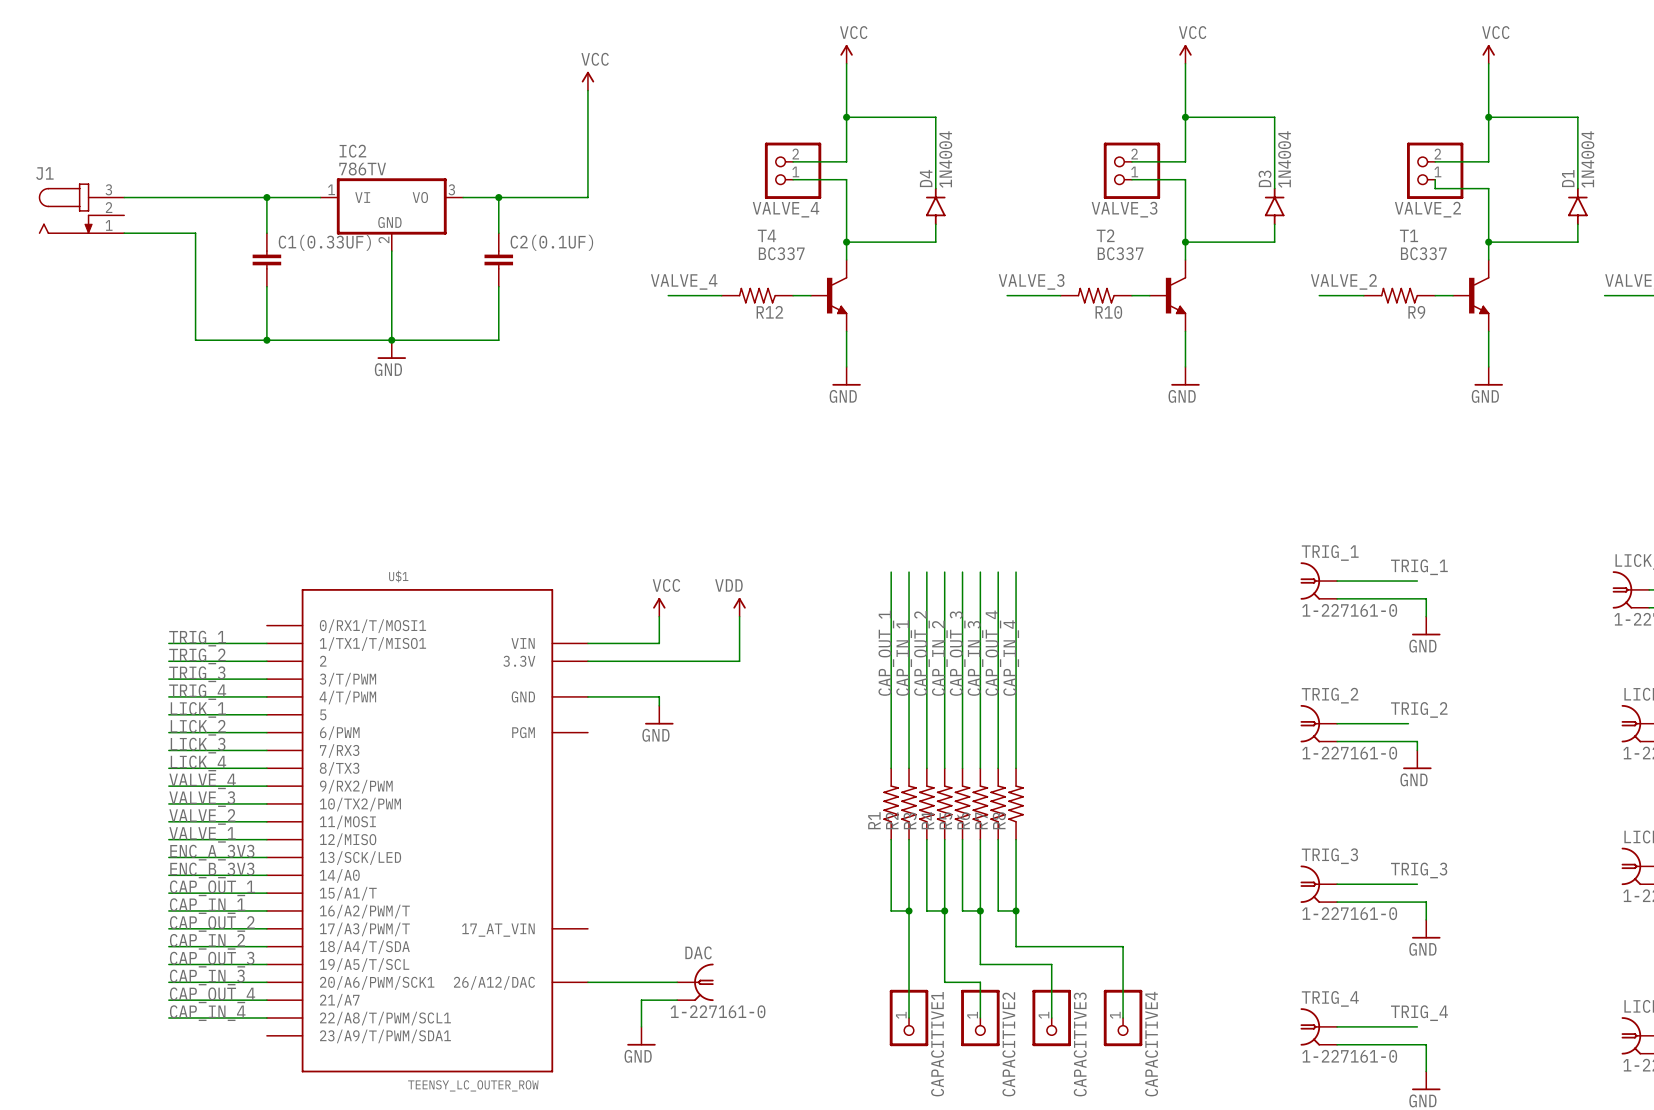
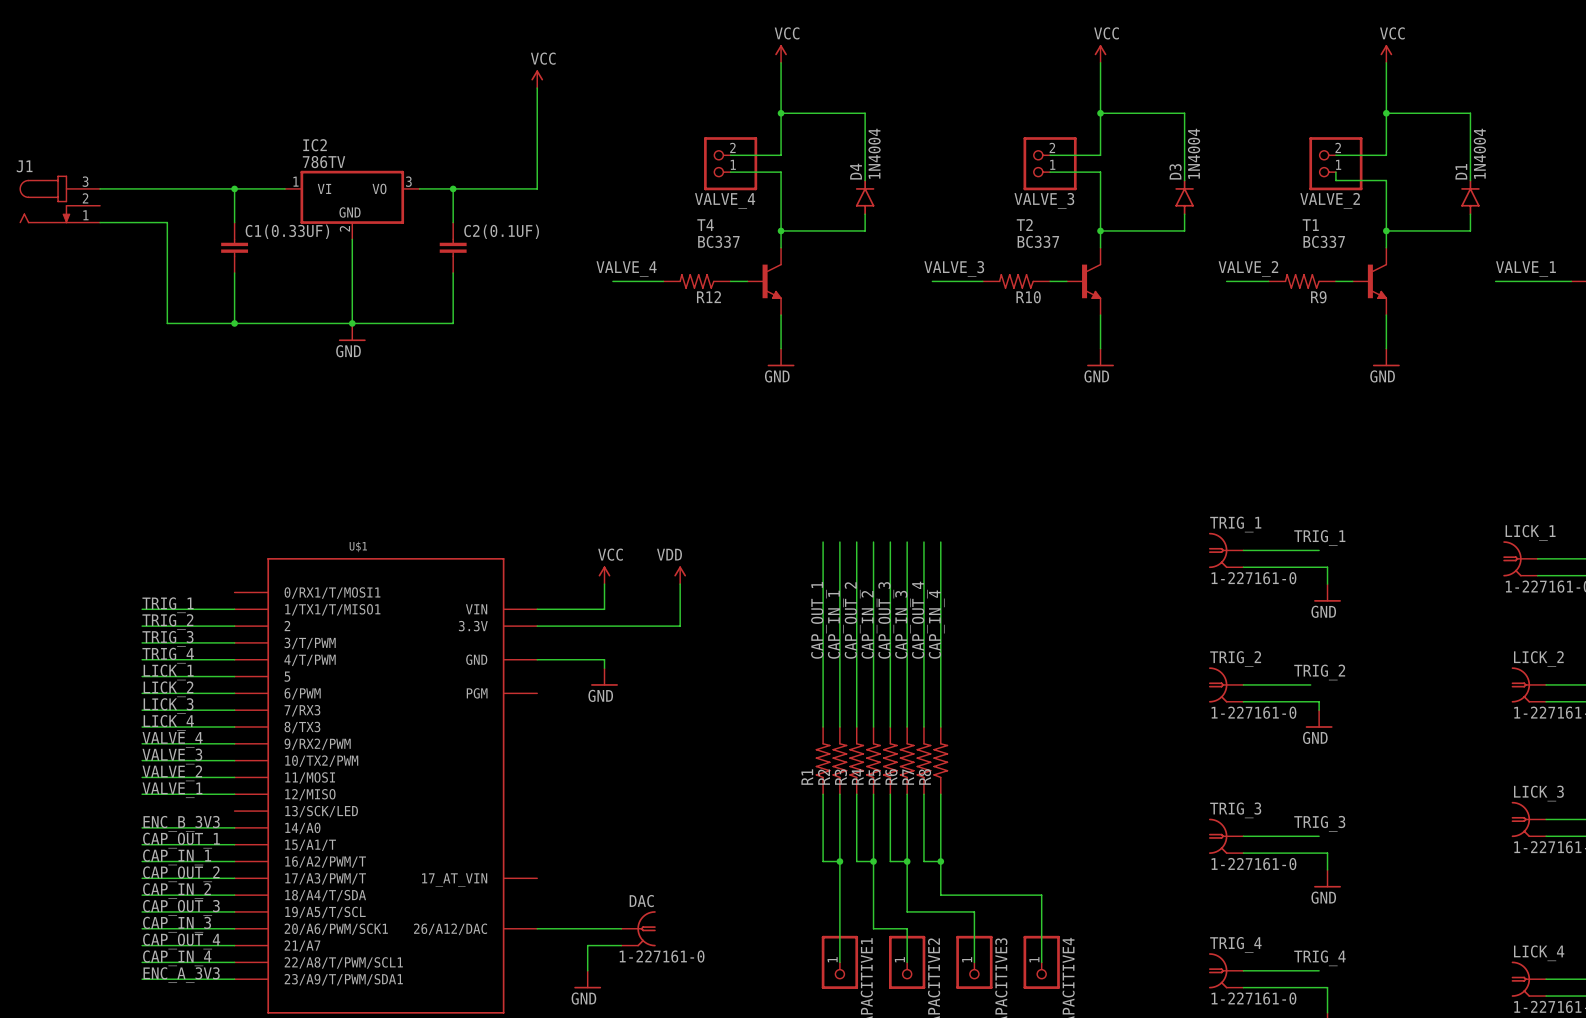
label: ENC_A_3V3 (212, 852) -> none
wire: (168, 857) (266, 857) -> none
label: none -> ENC_A_3V3 (181, 975)
wire: none -> (142, 979) (234, 979)

